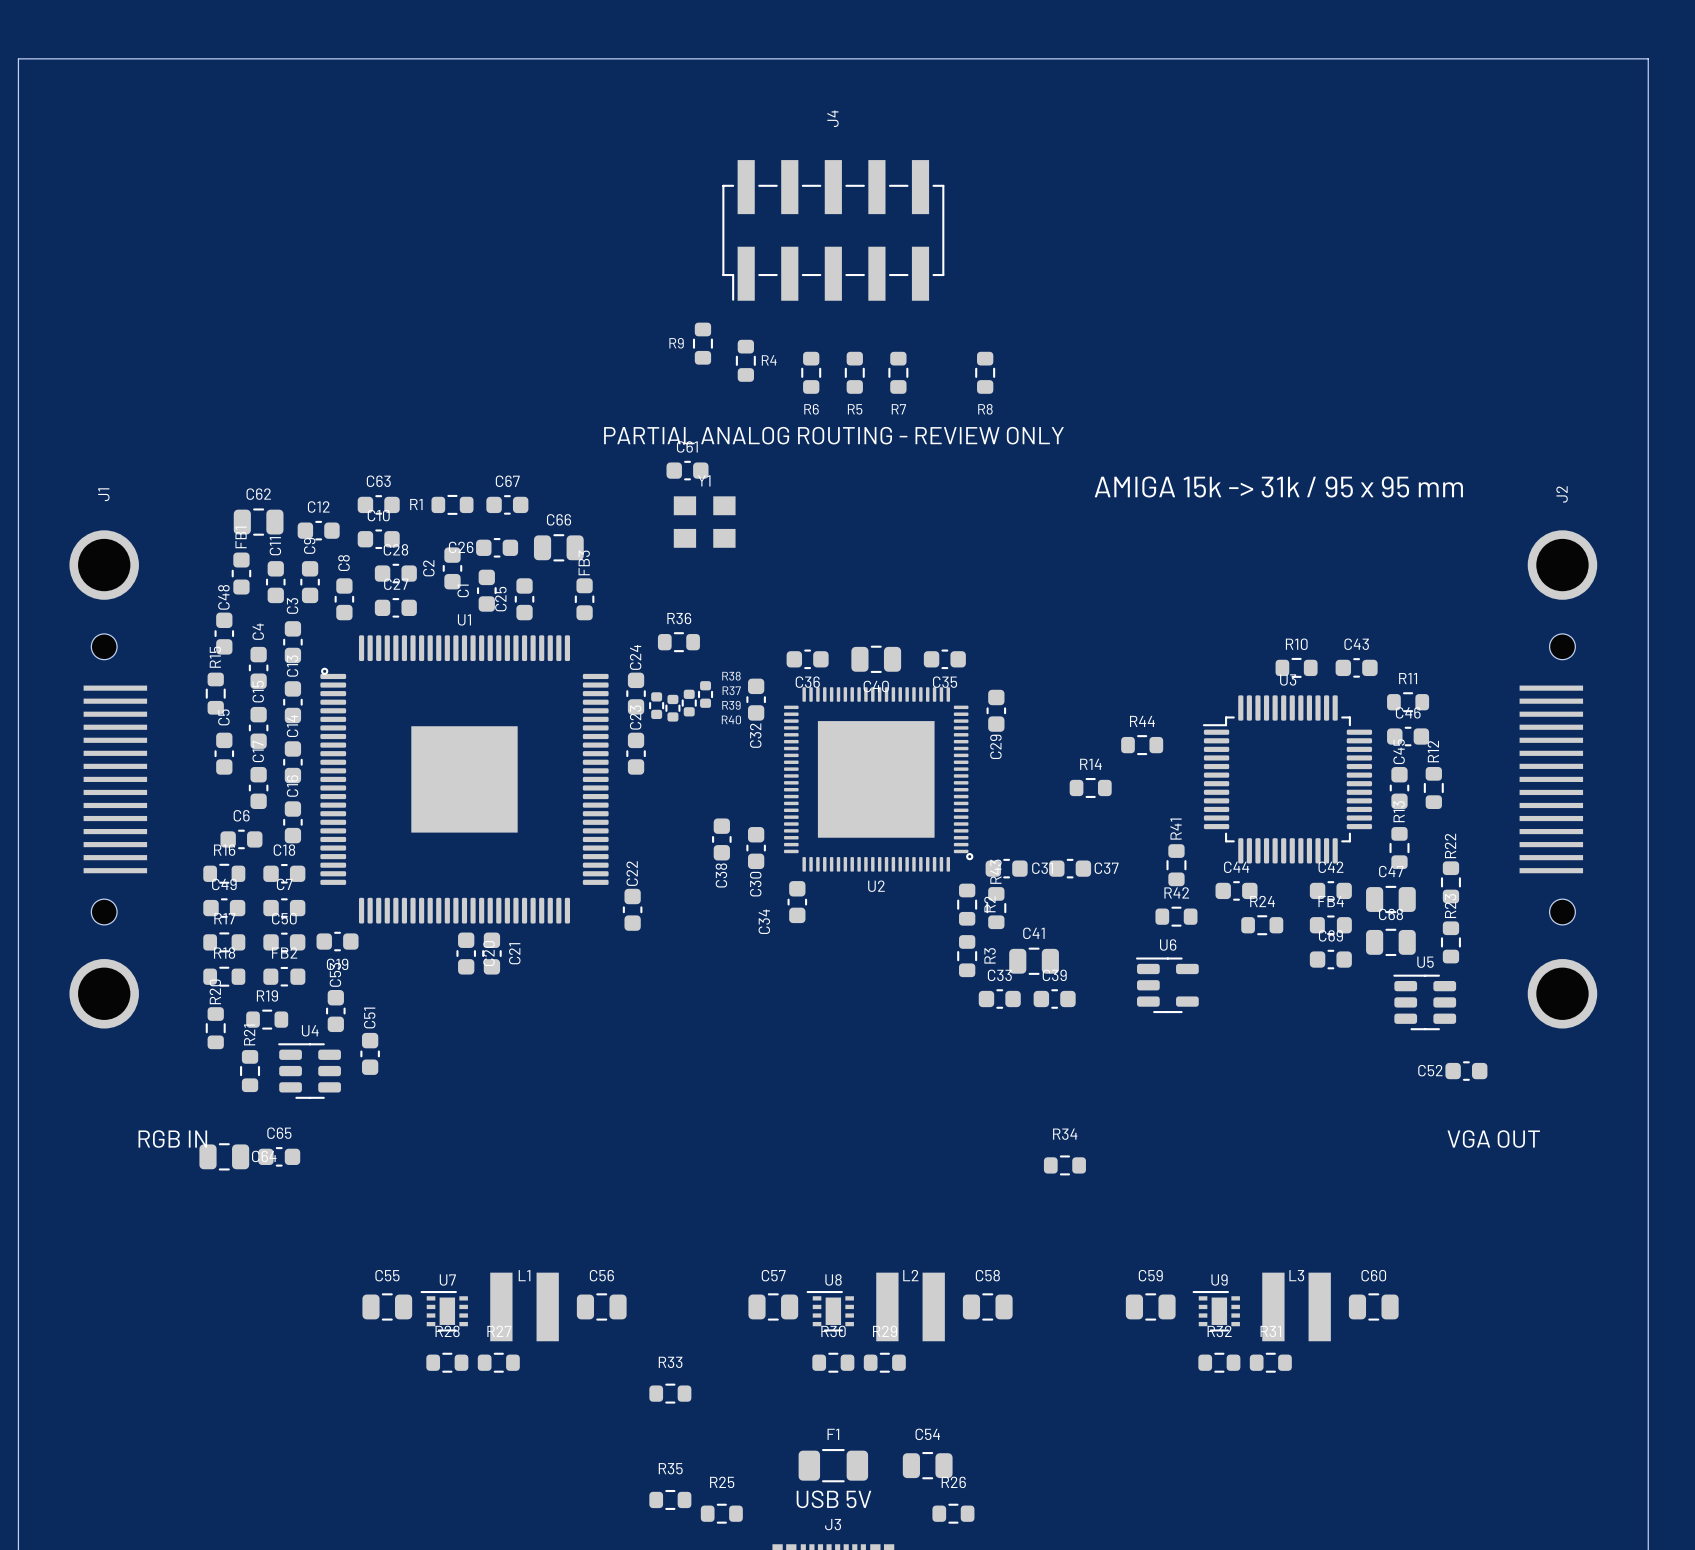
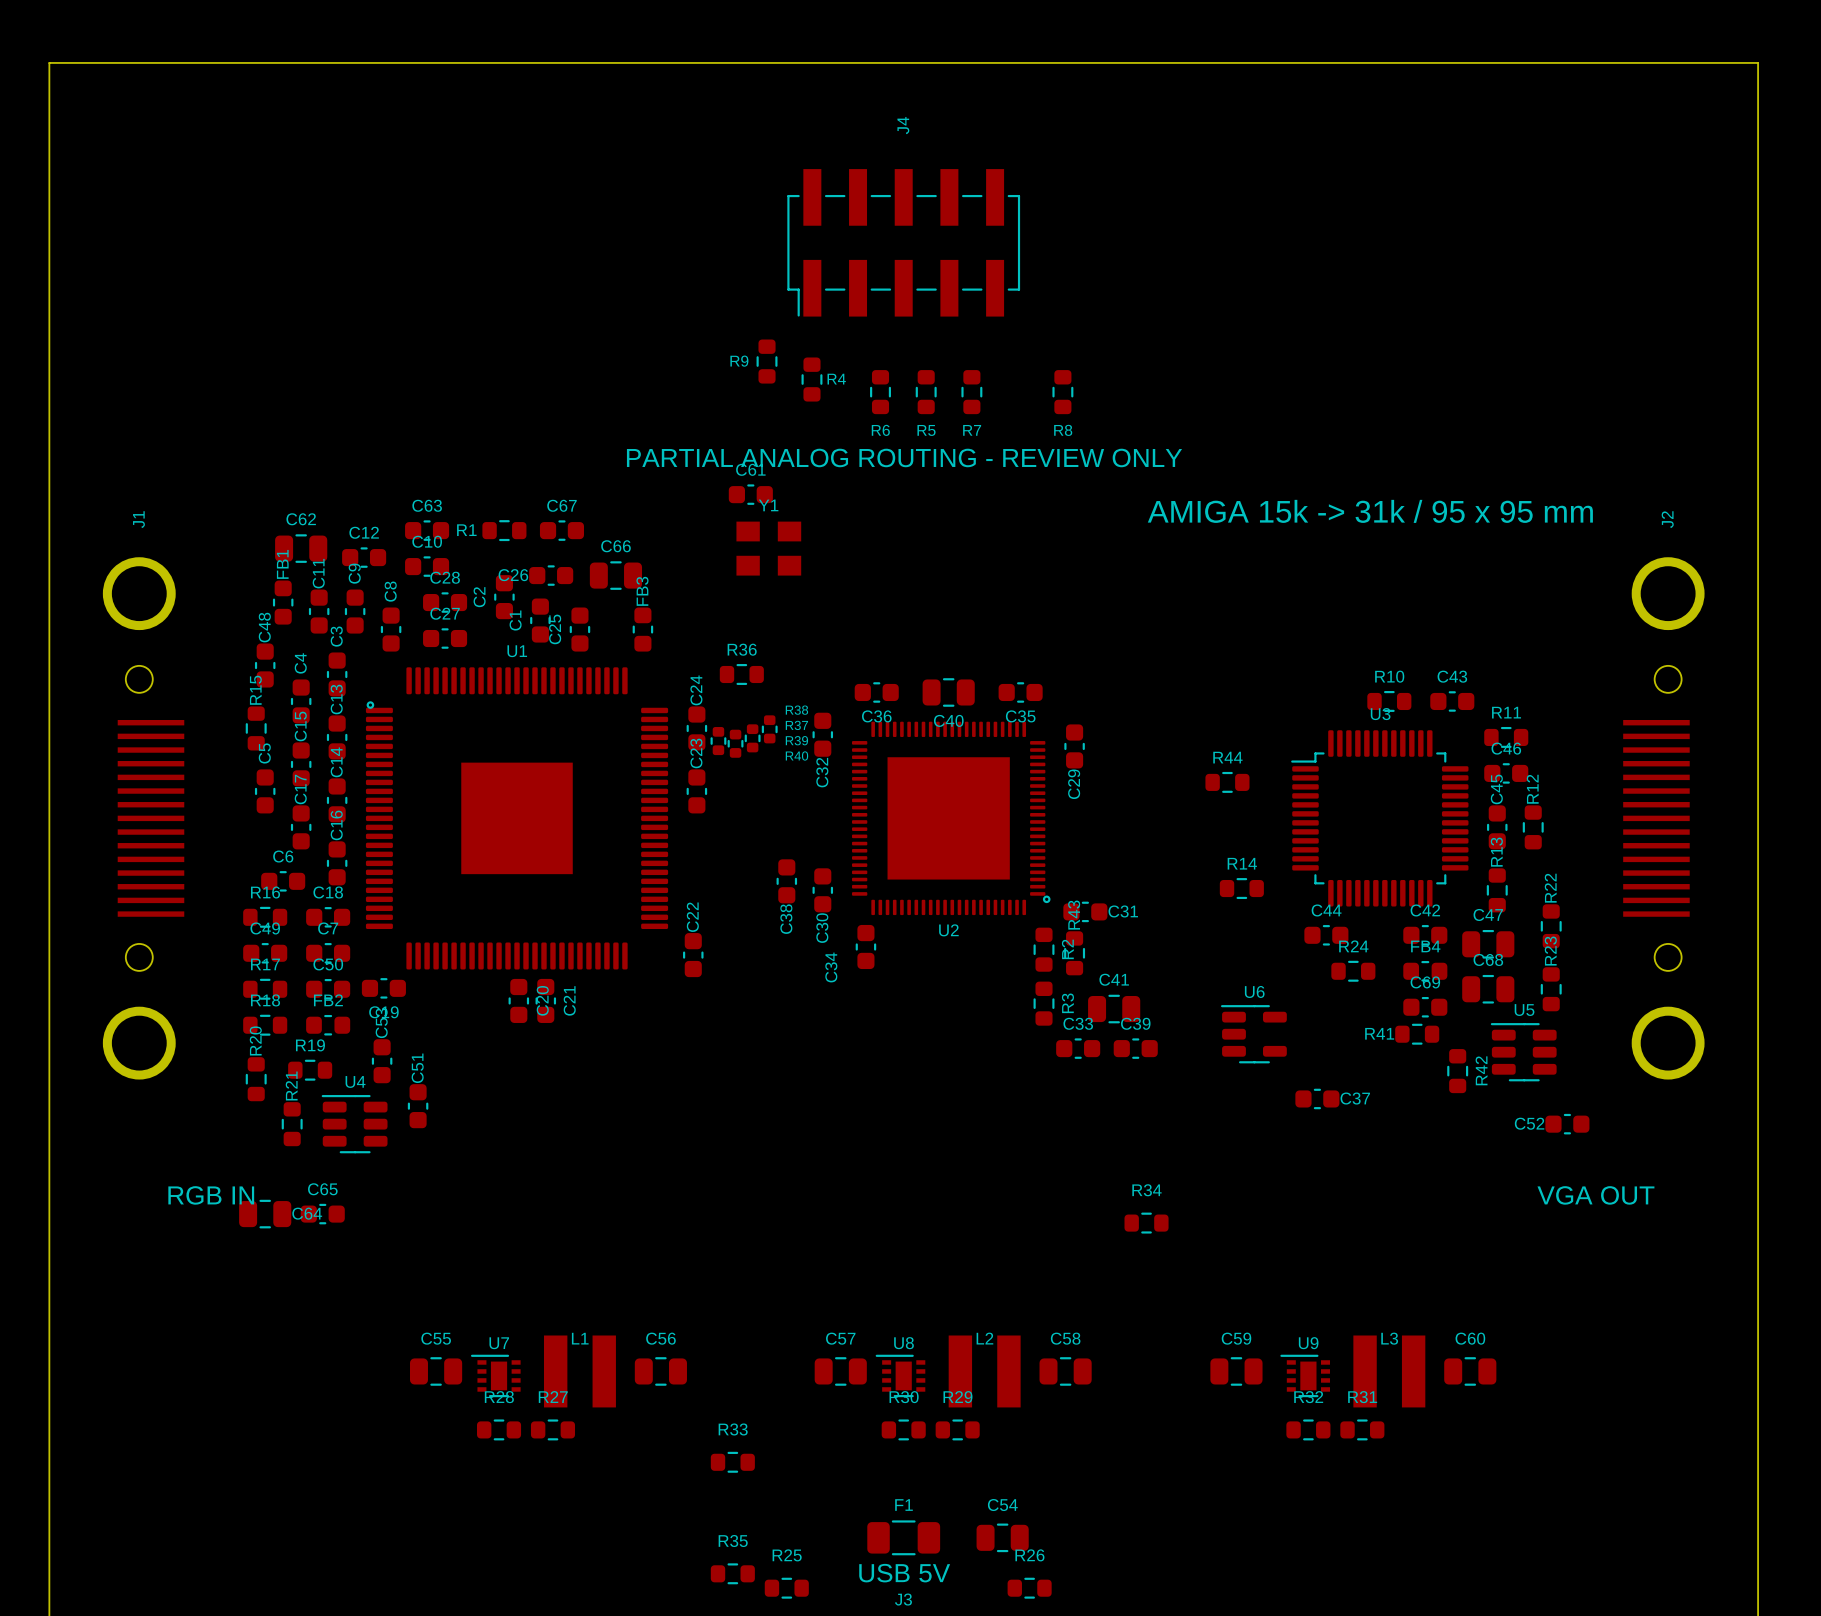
R14 position: (1090, 787) -> (1241, 888)
R41 name position: R41 (1176, 829) -> R41 (1379, 1033)
R41 rotation: 0° (1176, 865) -> 90° clockwise (1417, 1034)
R41 position: (1176, 865) -> (1417, 1034)
C37 position: (1070, 868) -> (1317, 1098)
R42 rotation: 0° (1176, 916) -> 90° clockwise (1457, 1071)
R42 position: (1176, 916) -> (1457, 1071)

